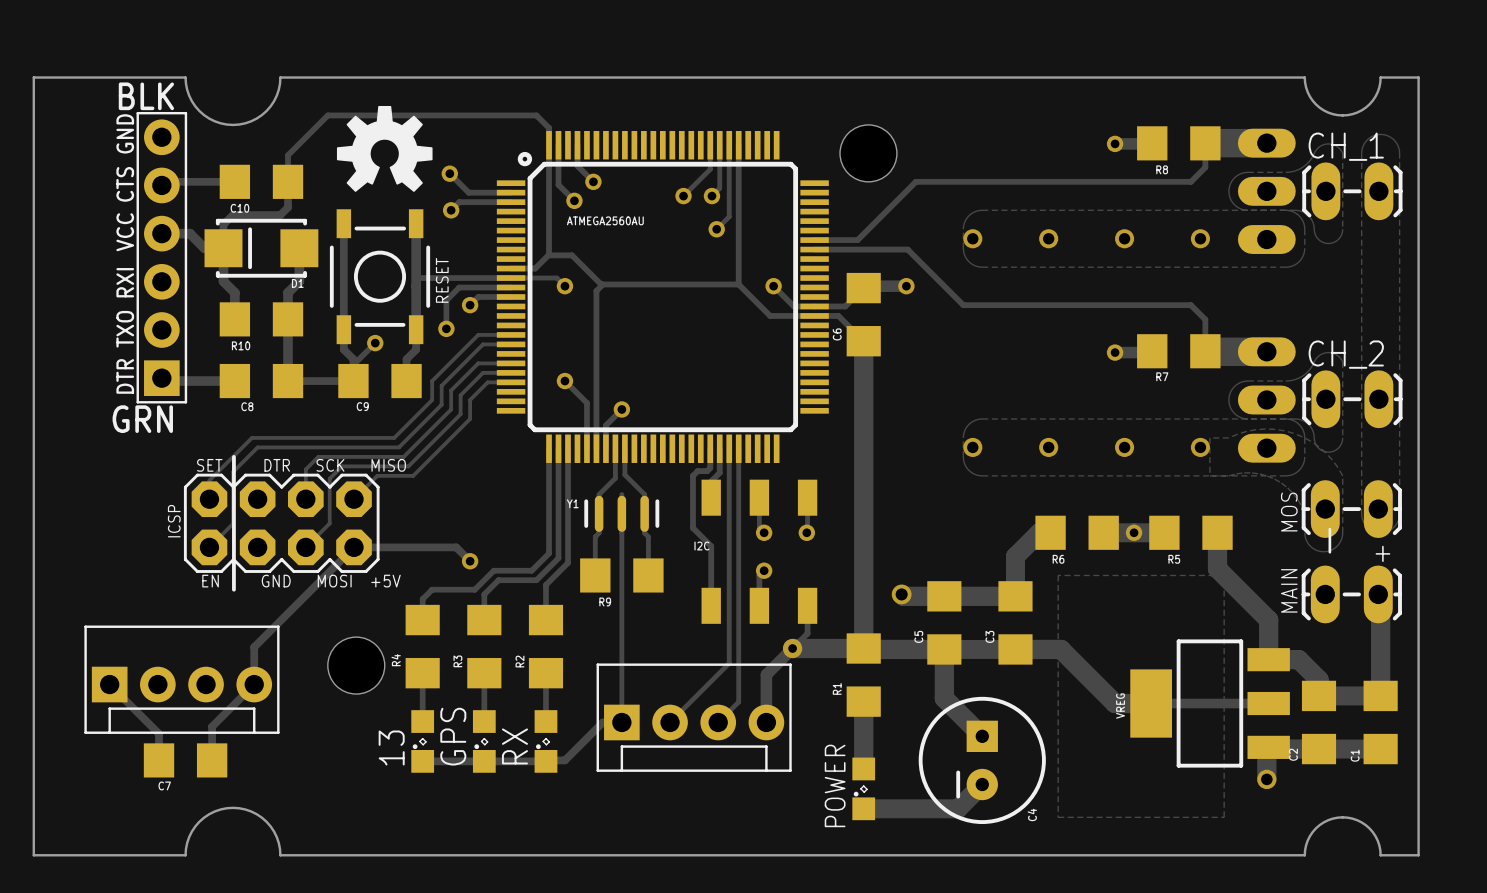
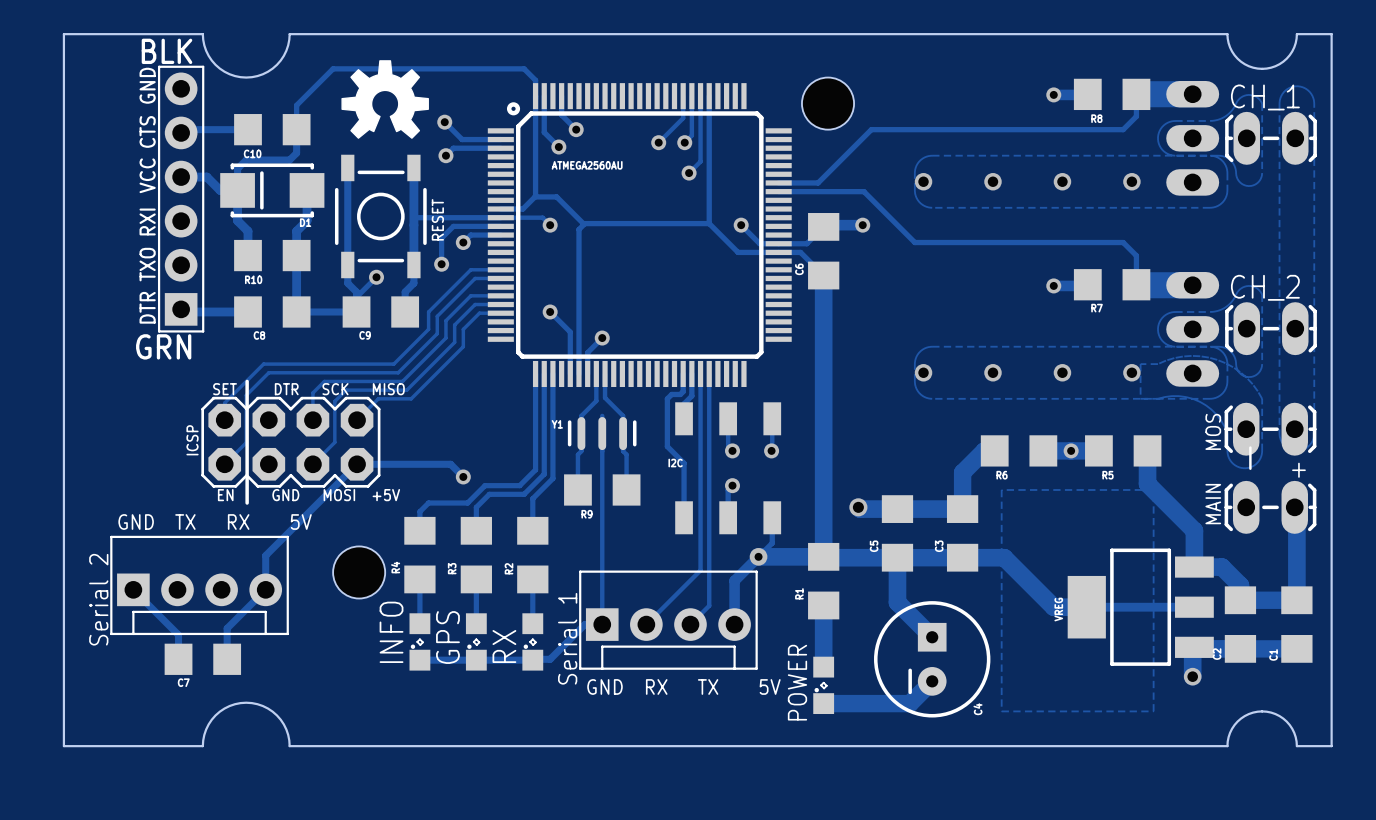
text: none -> GND TX RX 5V (215, 522)
text: none -> Serial 2 (98, 599)
text: none -> Serial 1 (567, 638)
13 name: 13 (391, 747) -> INFO (391, 632)
text: none -> GND RX TX 5V (683, 686)

